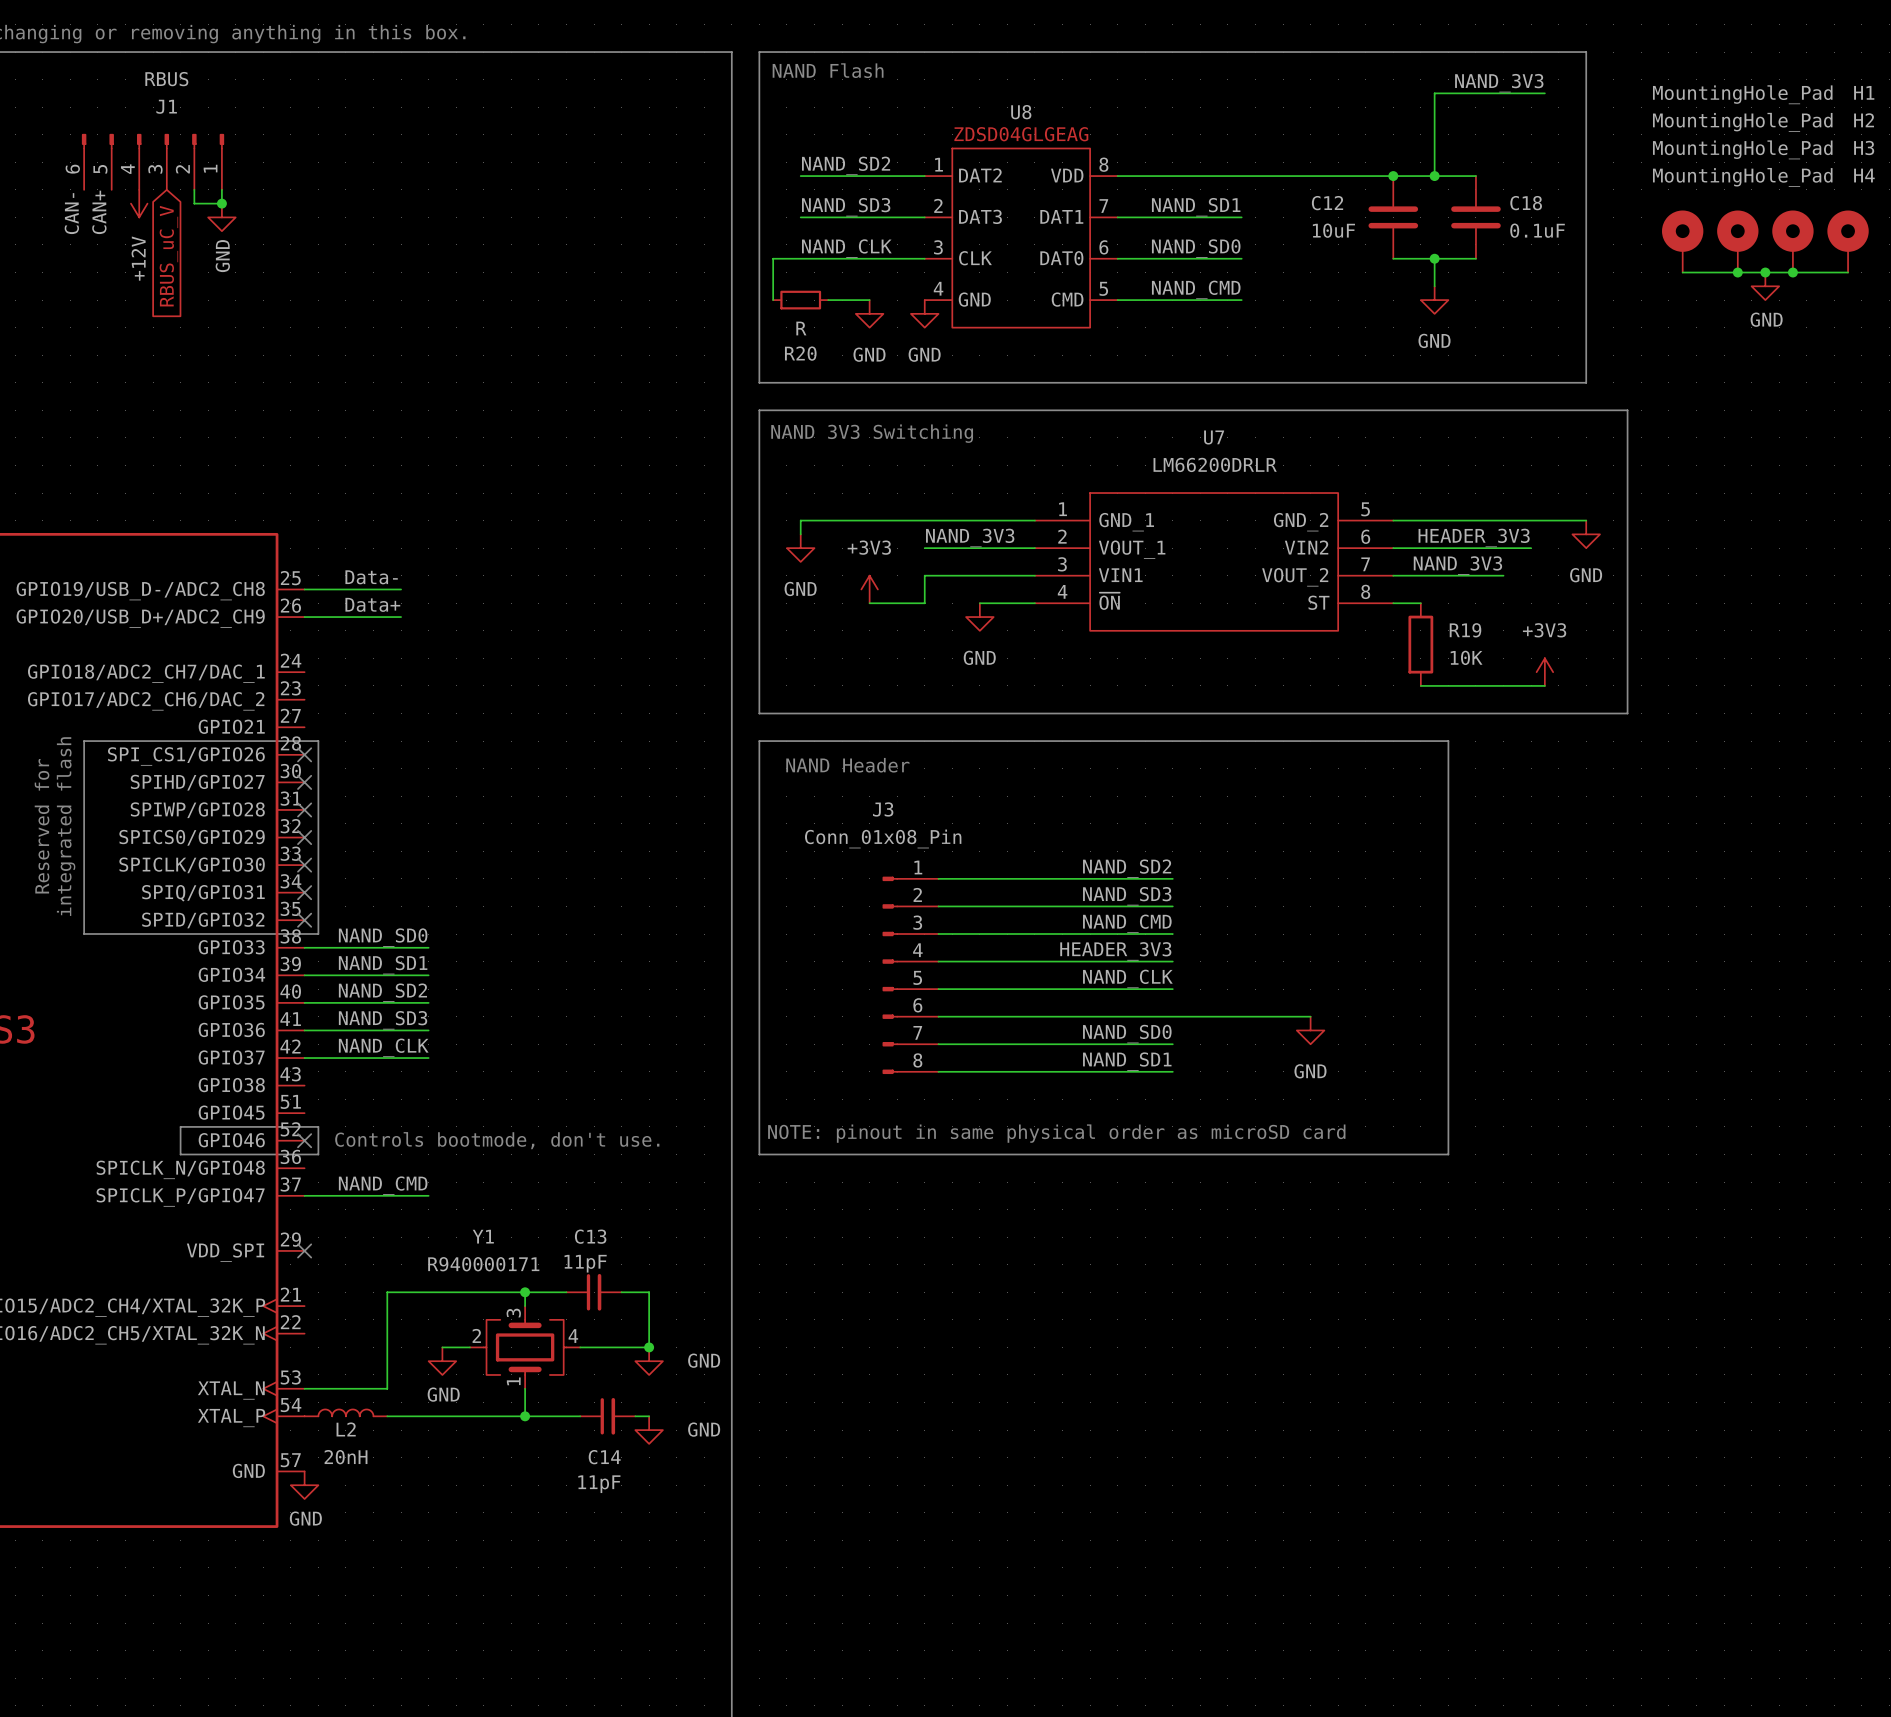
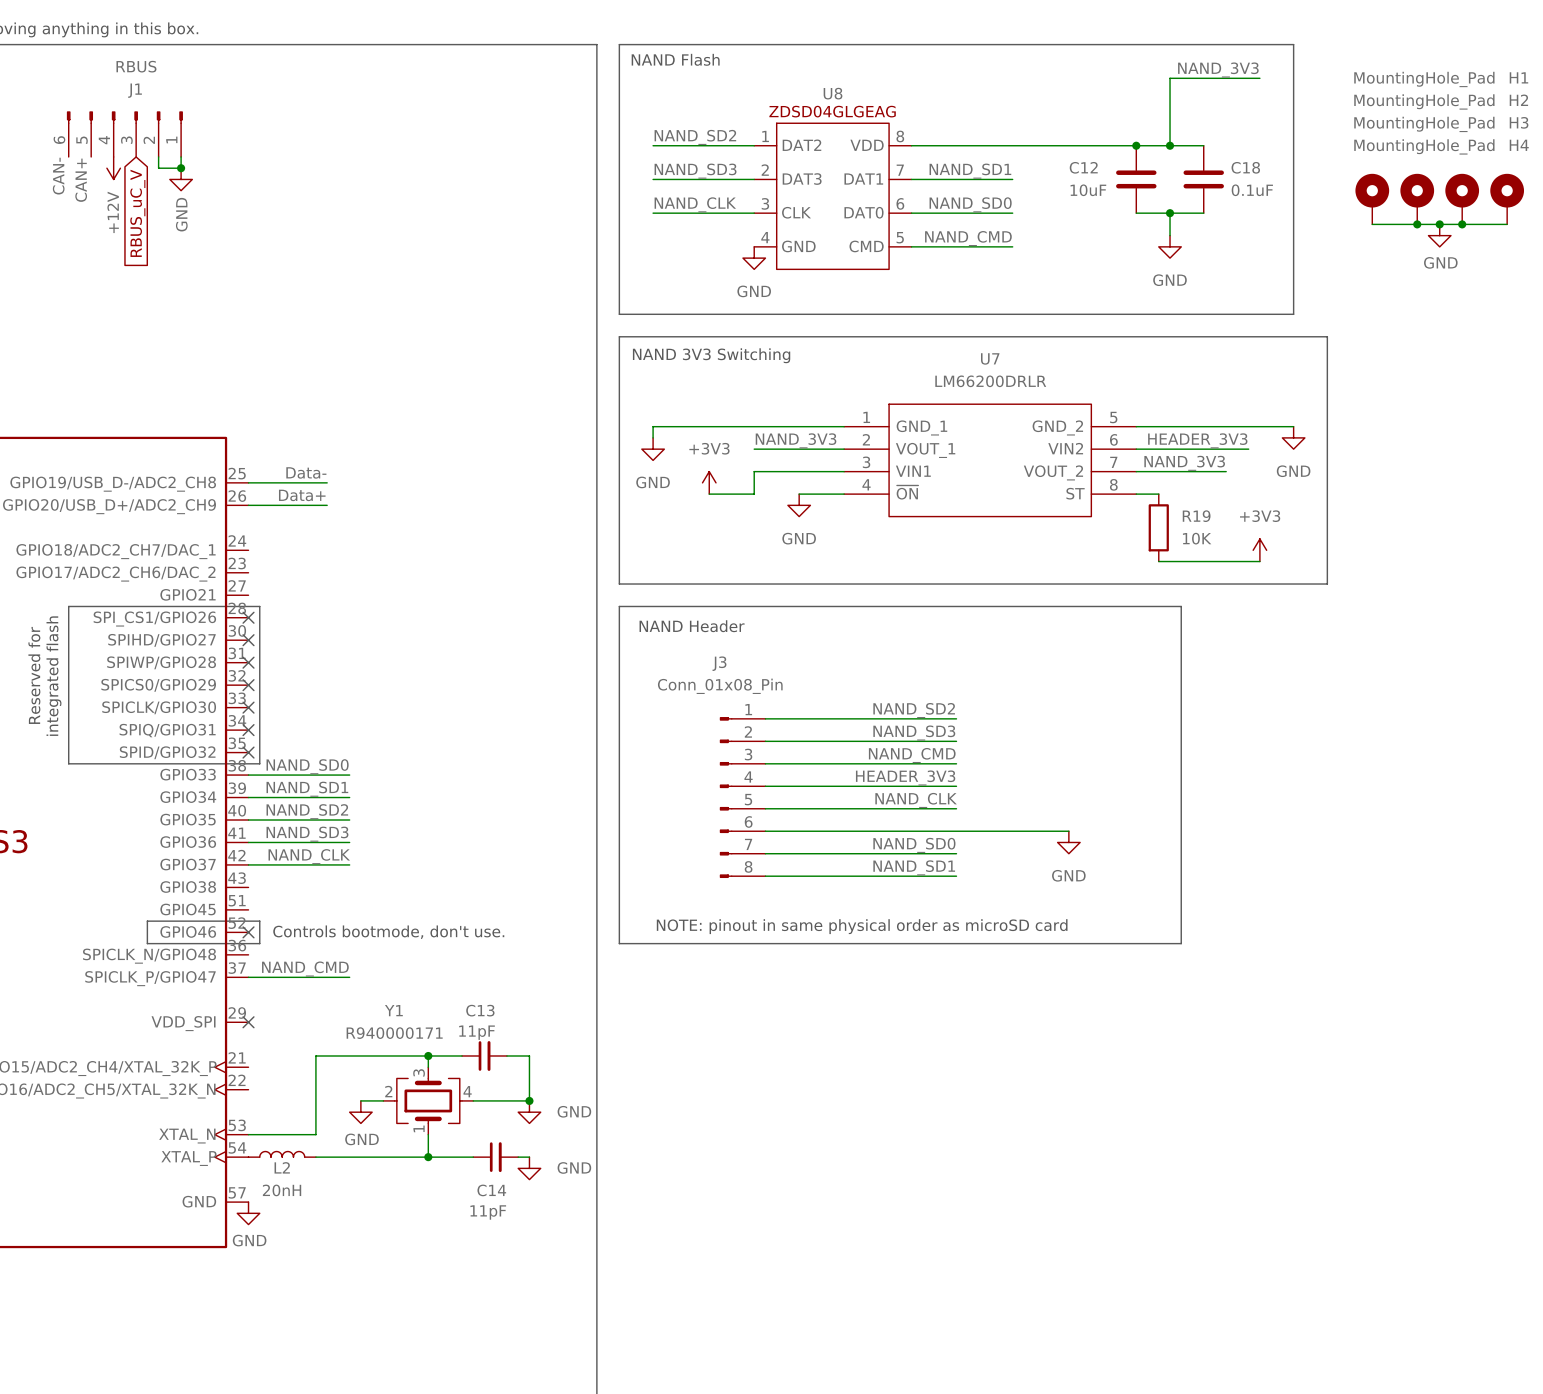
wire: (800, 258) (773, 258) (773, 300) -> none
R20: R (800, 300) -> none
wire: (828, 300) (869, 300) -> none
power symbol: GND (869, 313) -> none

